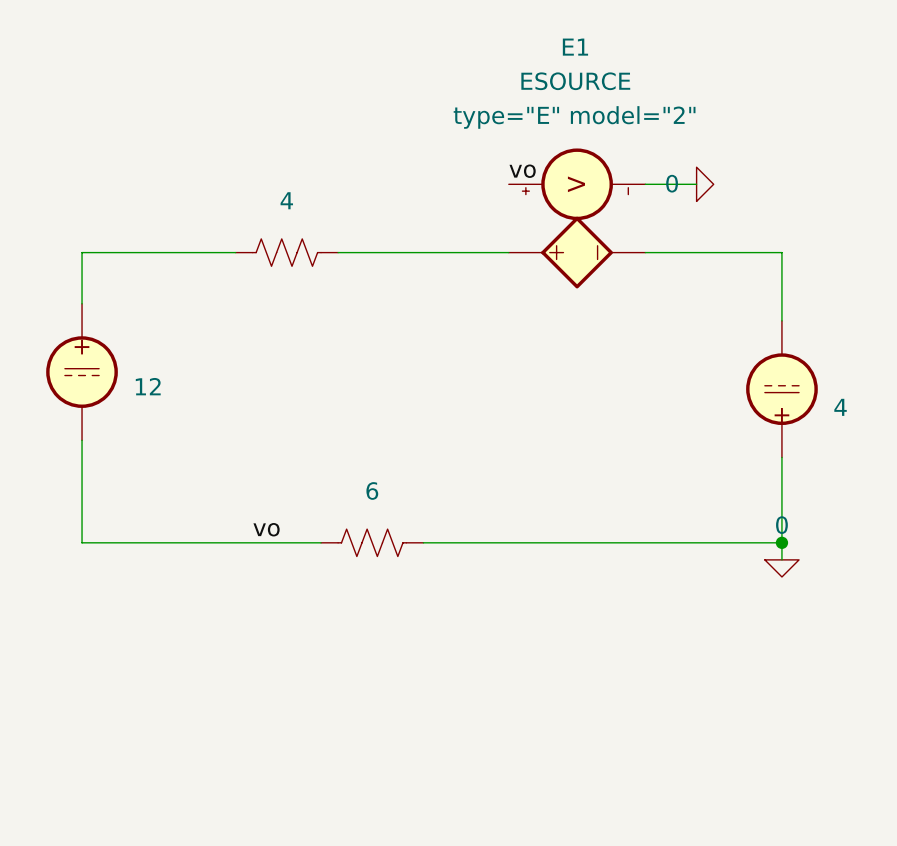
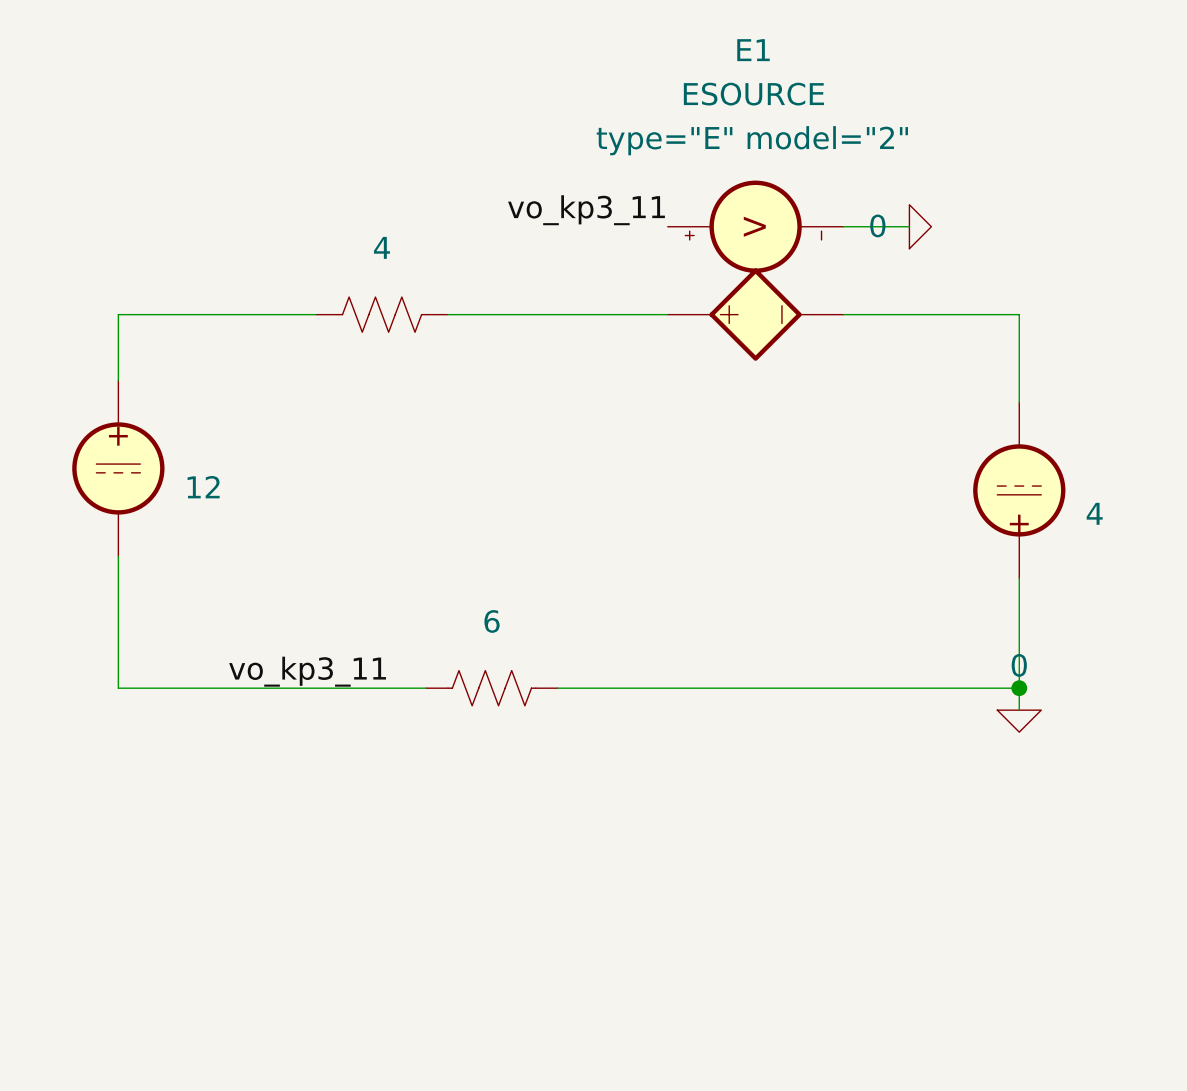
label: vo (522, 171) -> vo_kp3_11 (586, 210)
label: none -> vo_kp3_11 (307, 671)
label: vo (266, 529) -> none

